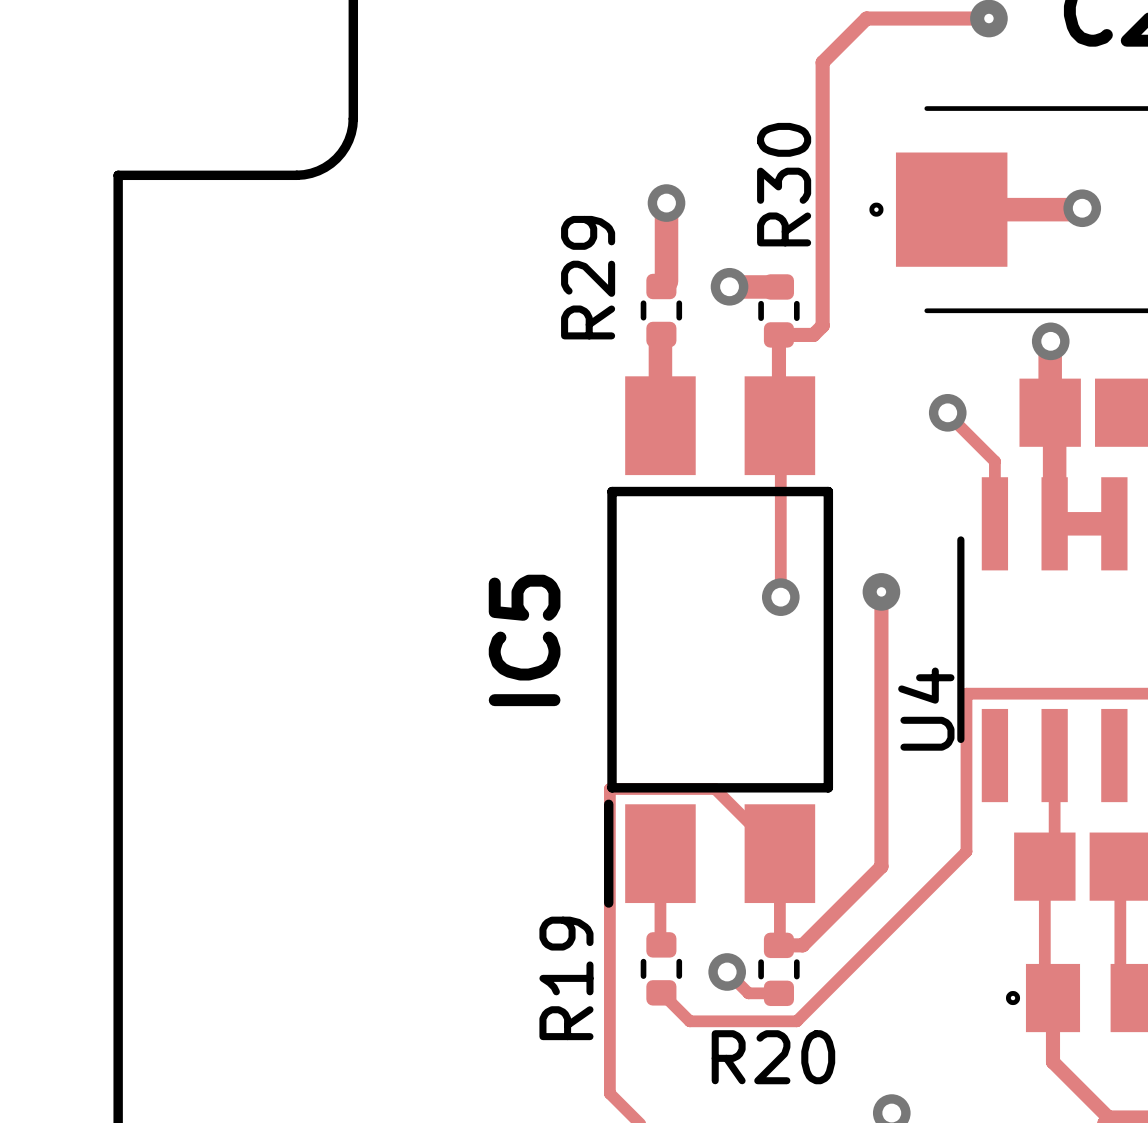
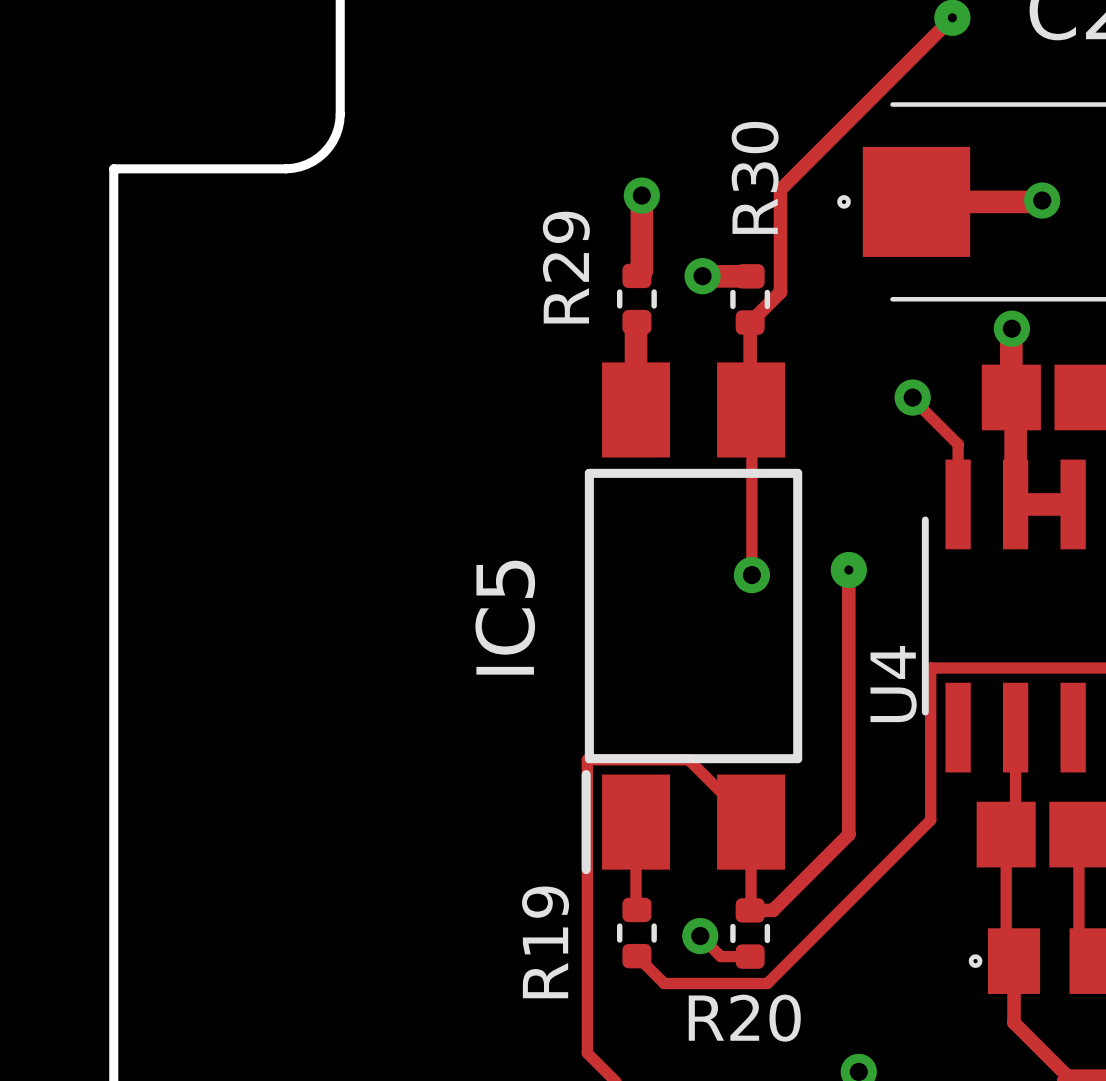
track: (988, 18) (866, 18) (822, 62) (822, 325) (813, 334) (778, 334) -> (952, 17) (780, 189) (780, 292) (750, 322)

